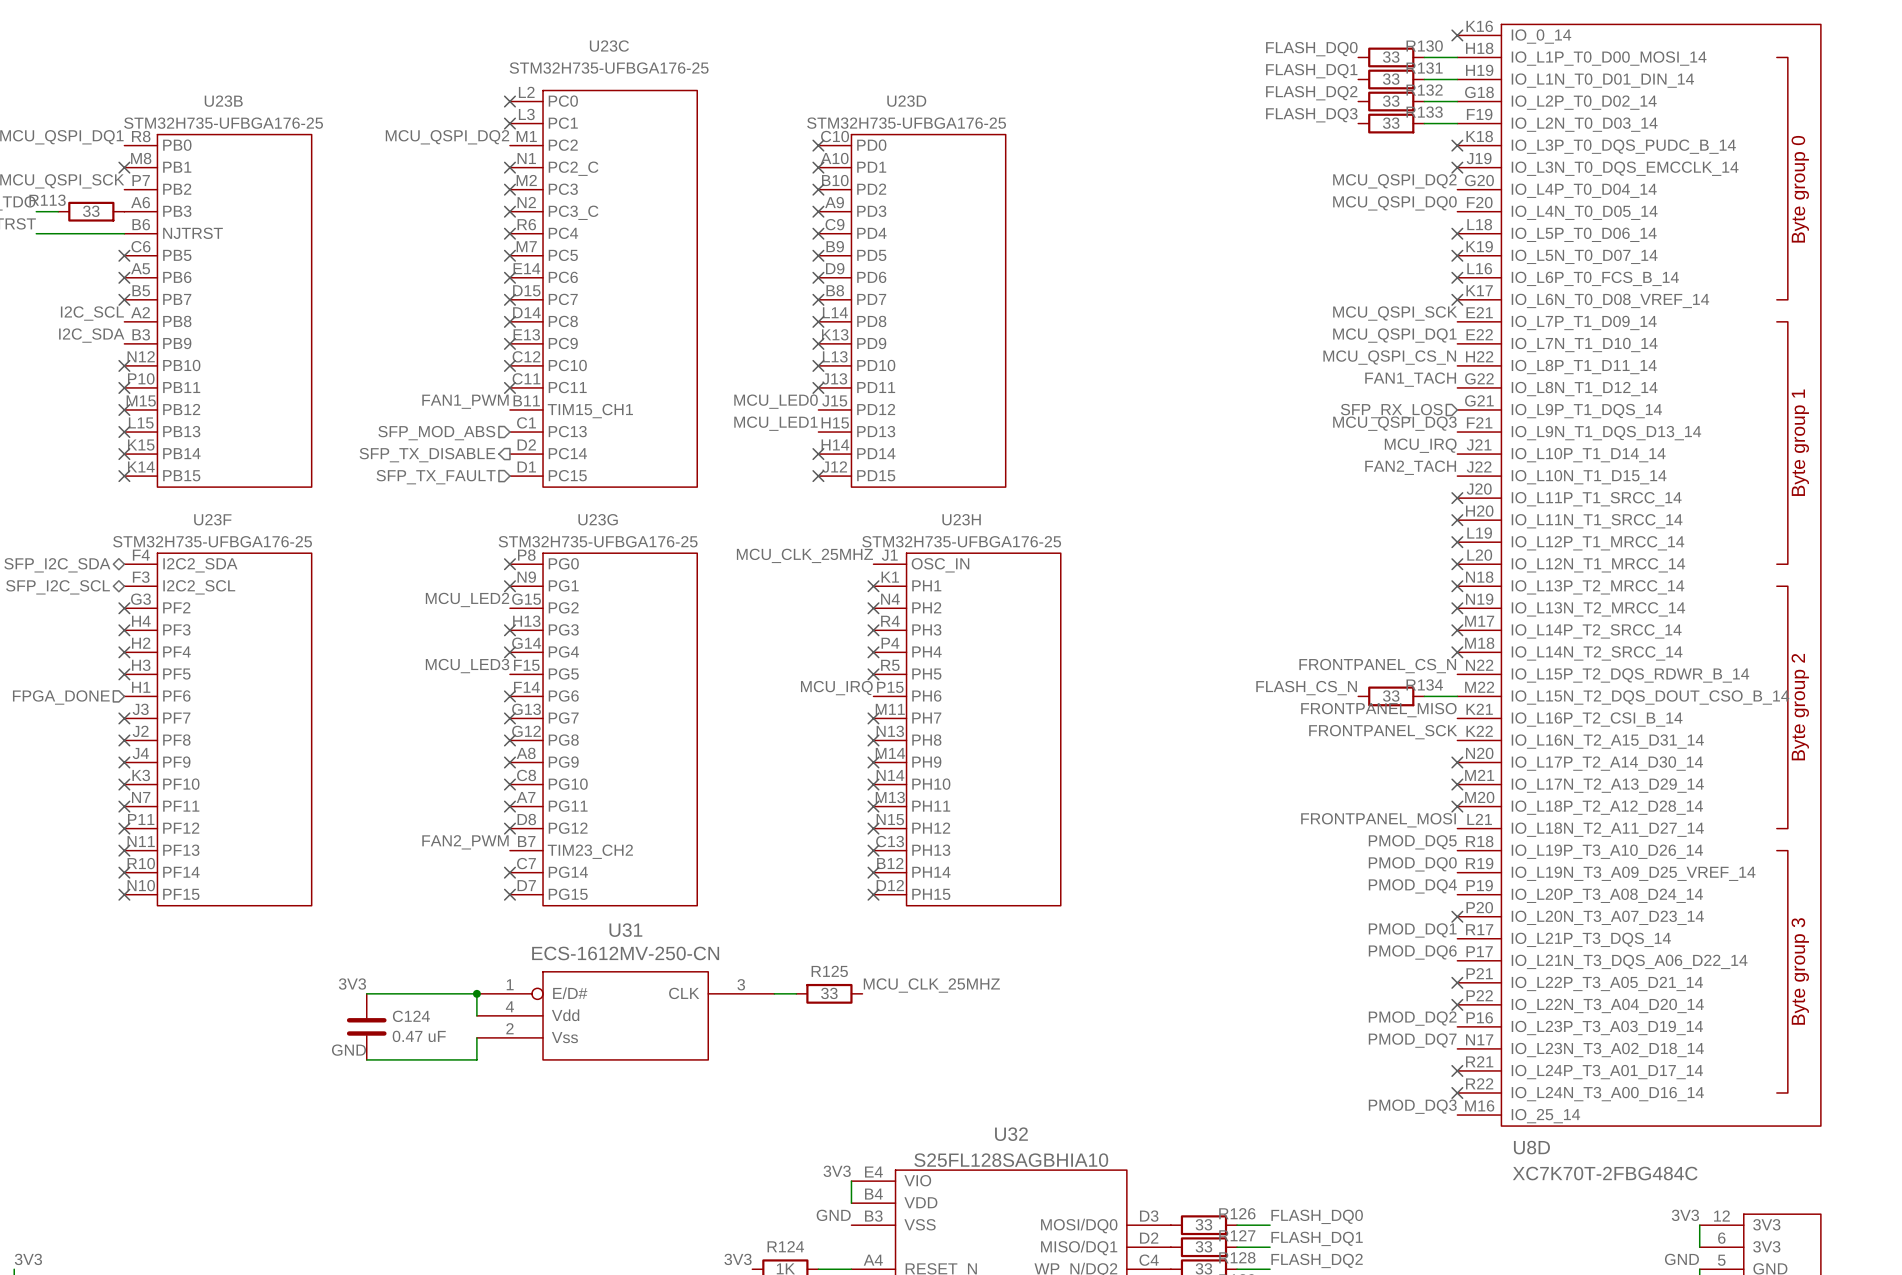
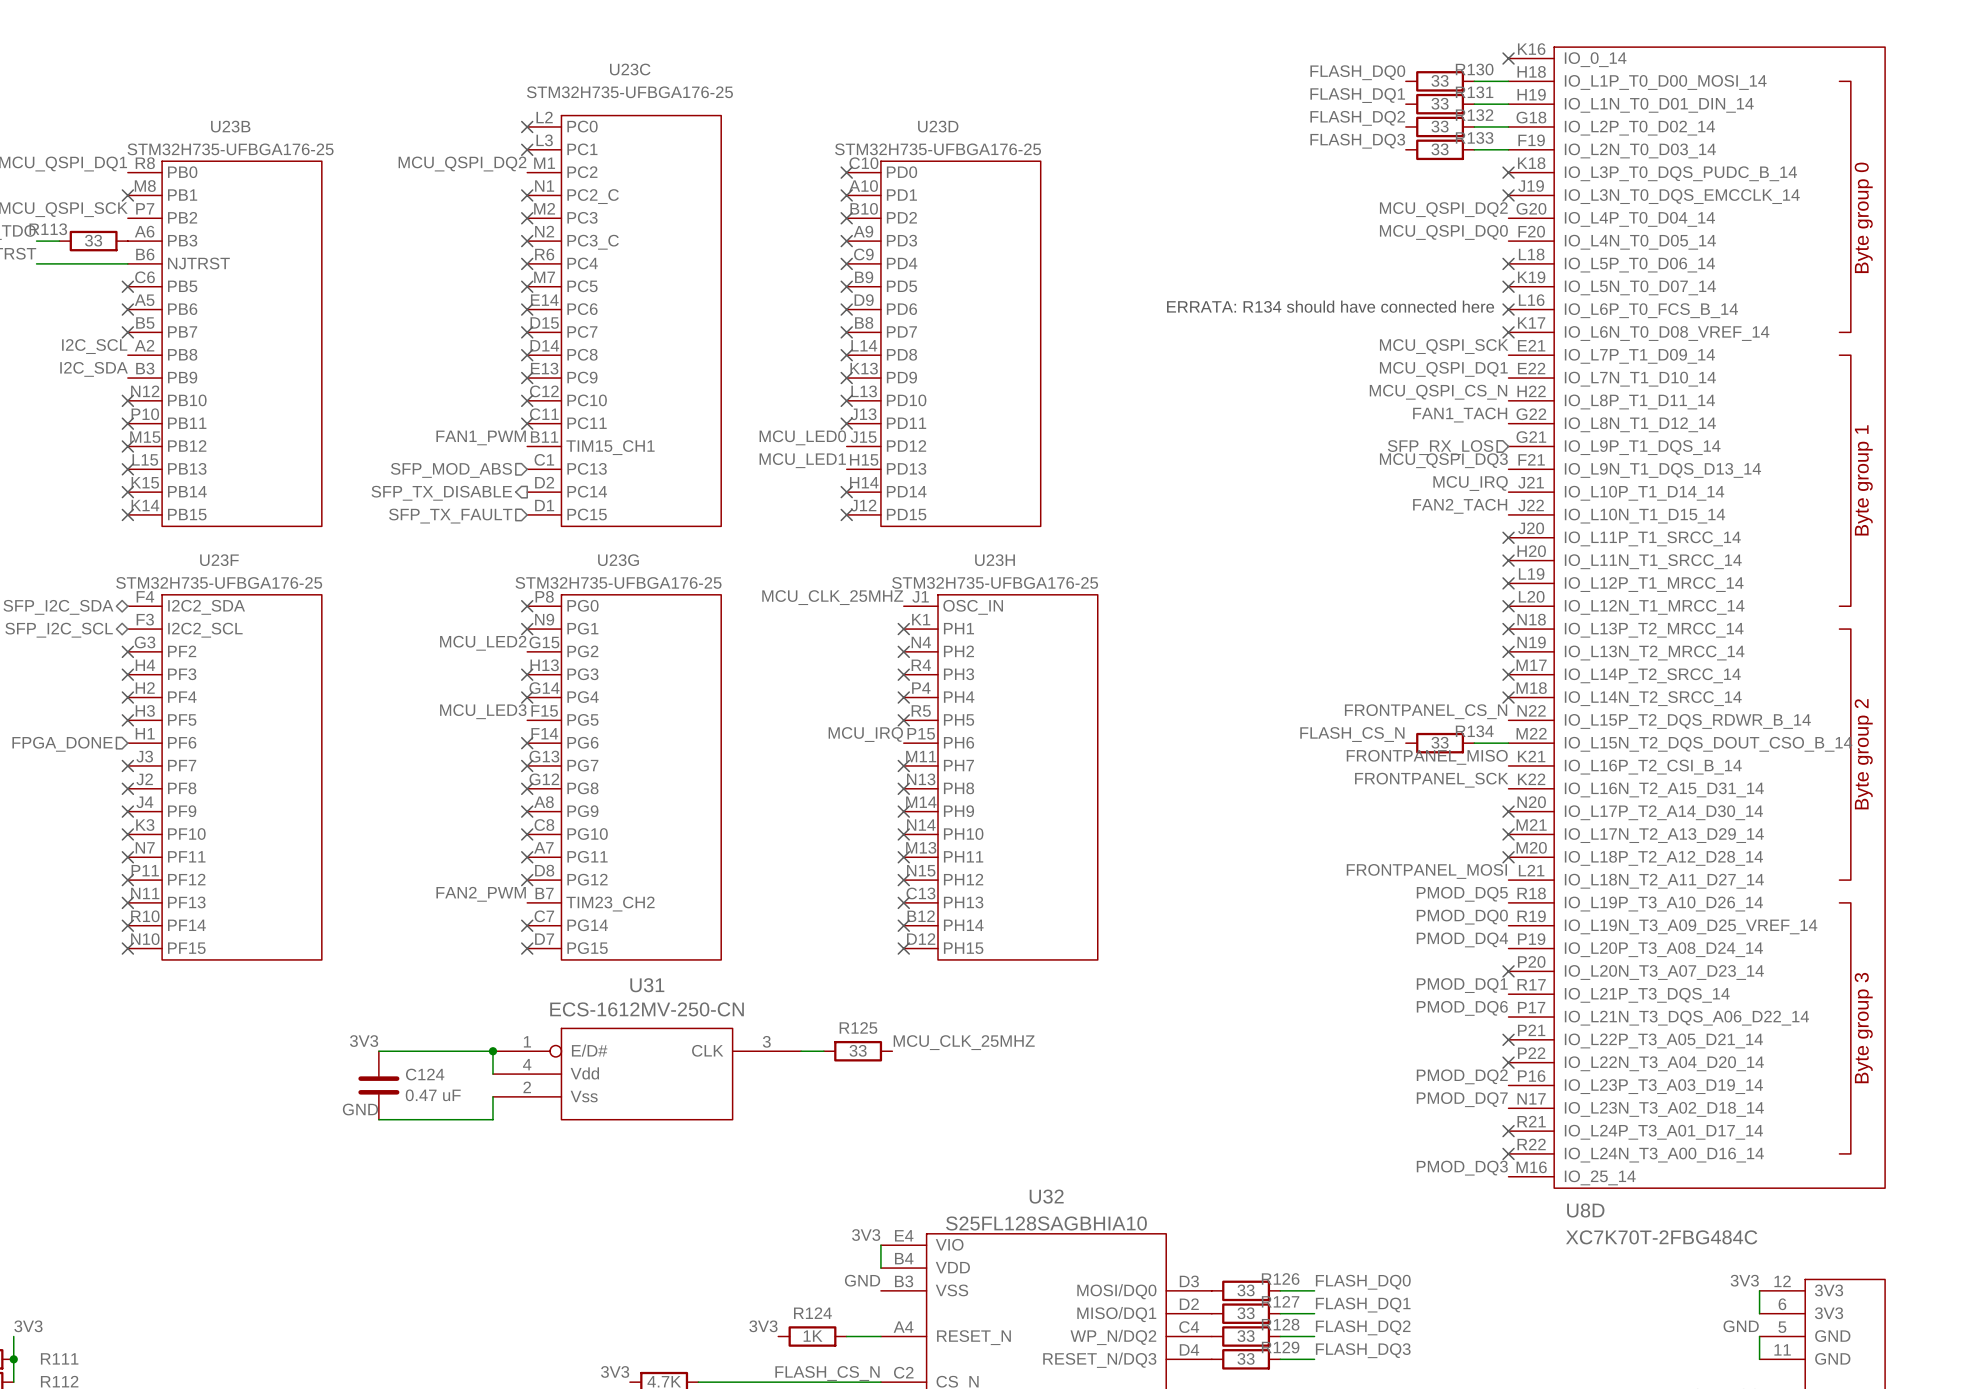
text: none -> ERRATA: R134 should have connected here (1330, 306)

